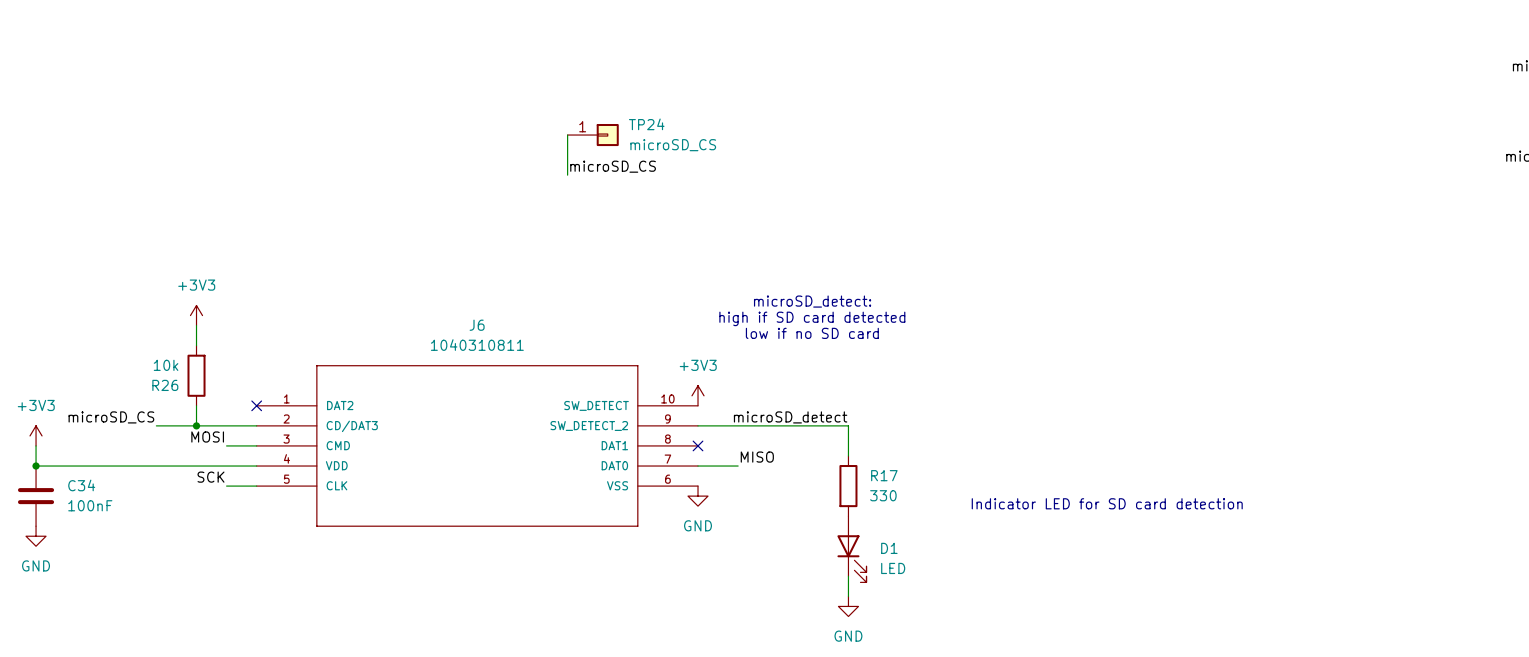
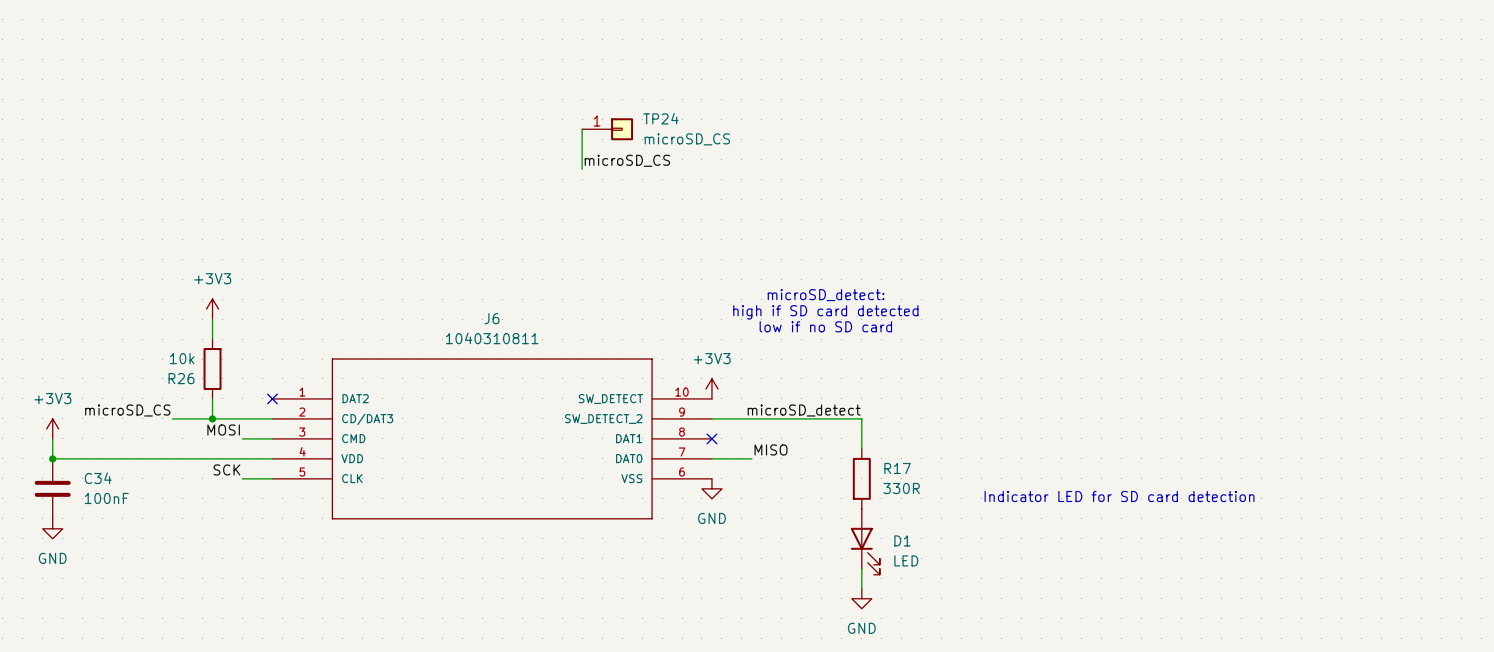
R17 value: 330 (883, 495) -> 330R (901, 488)

